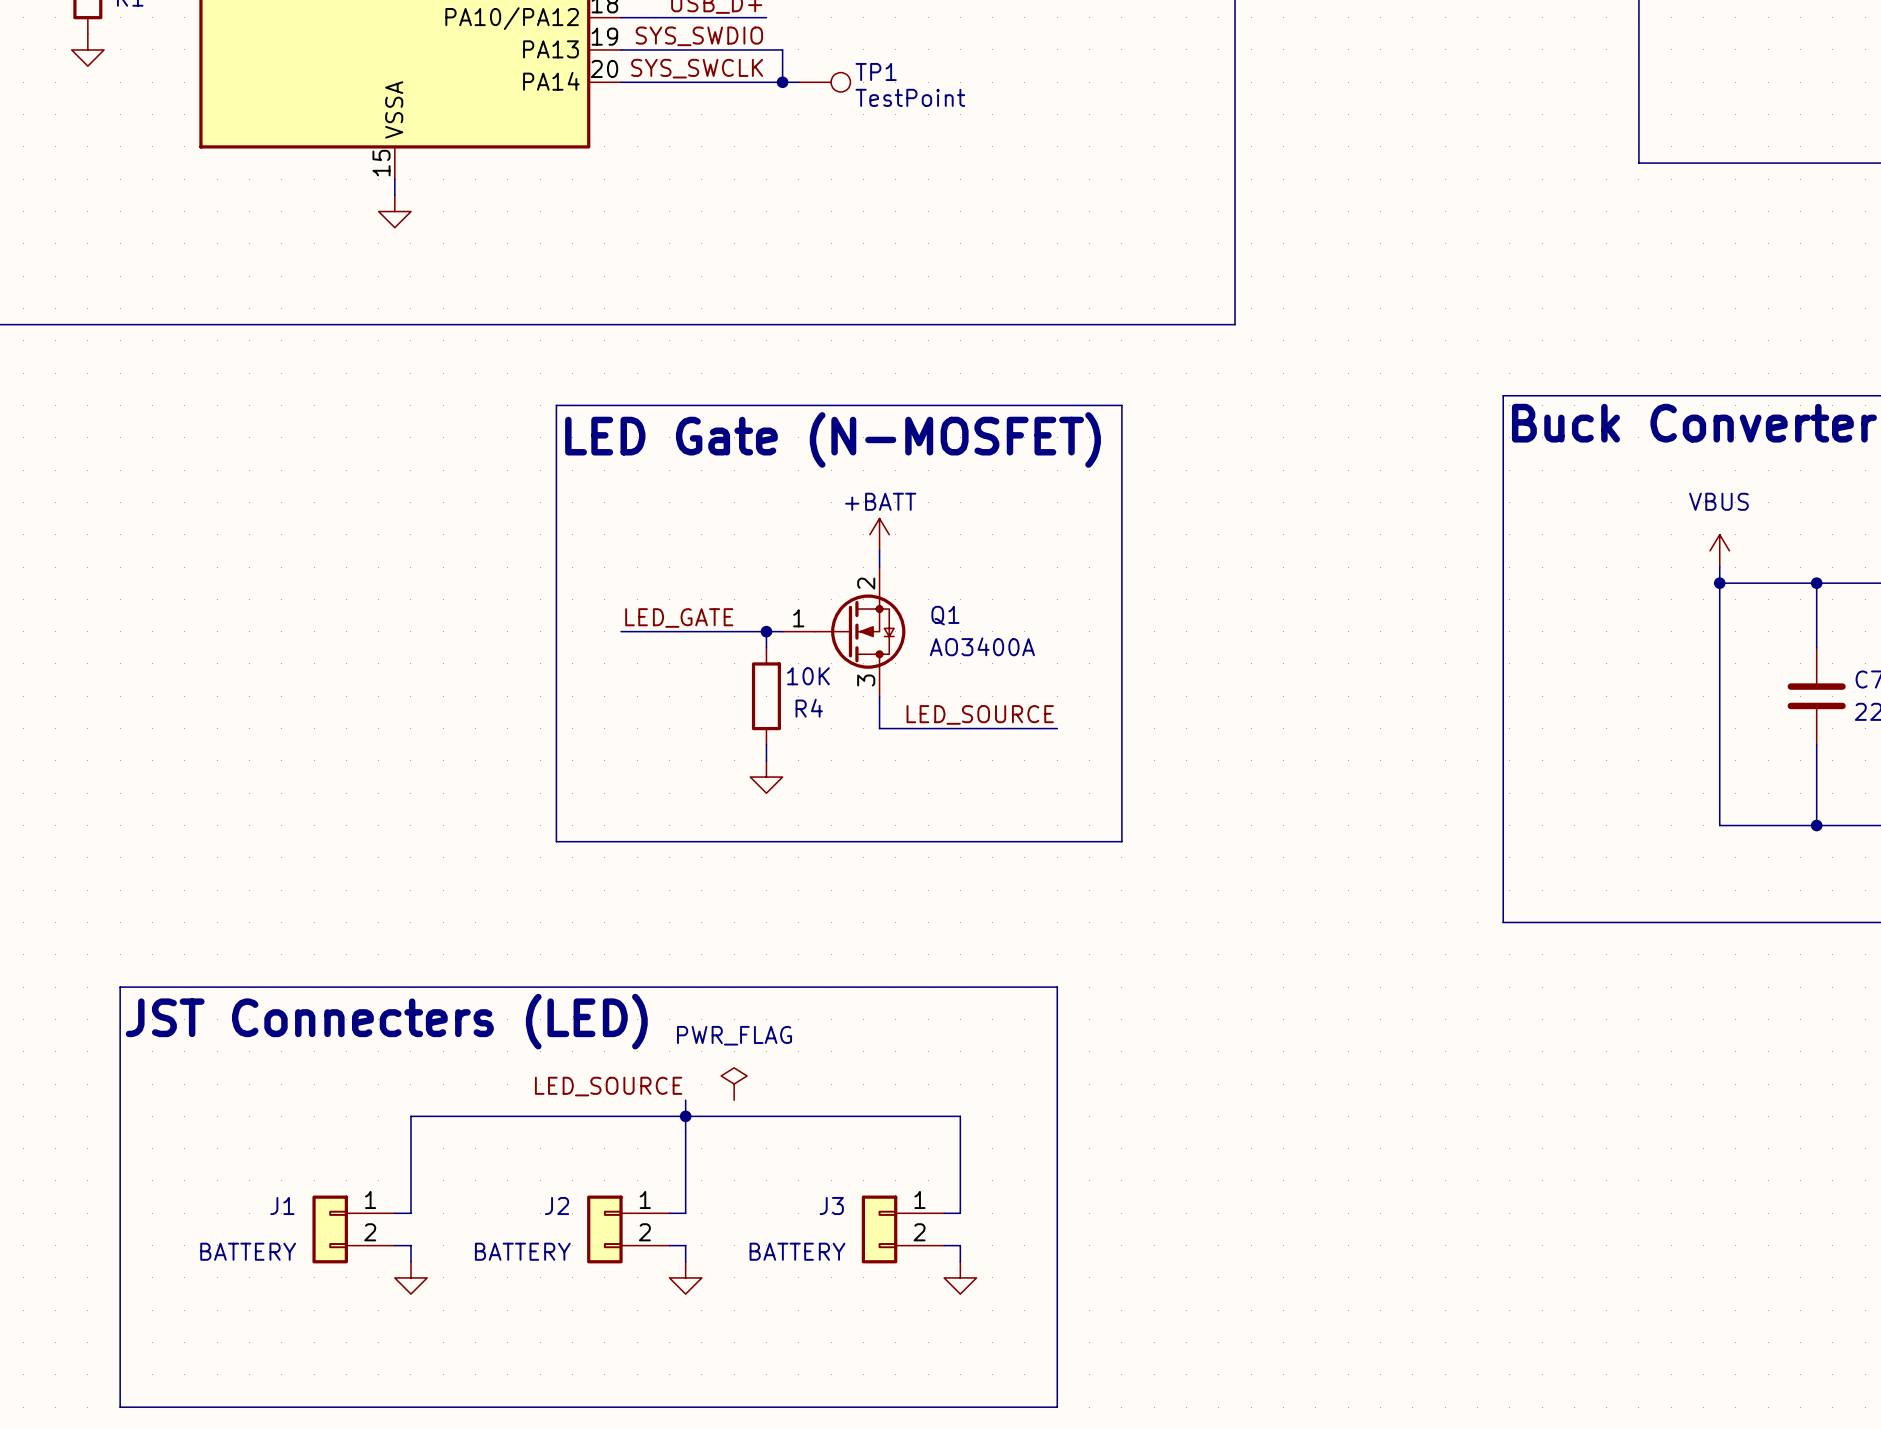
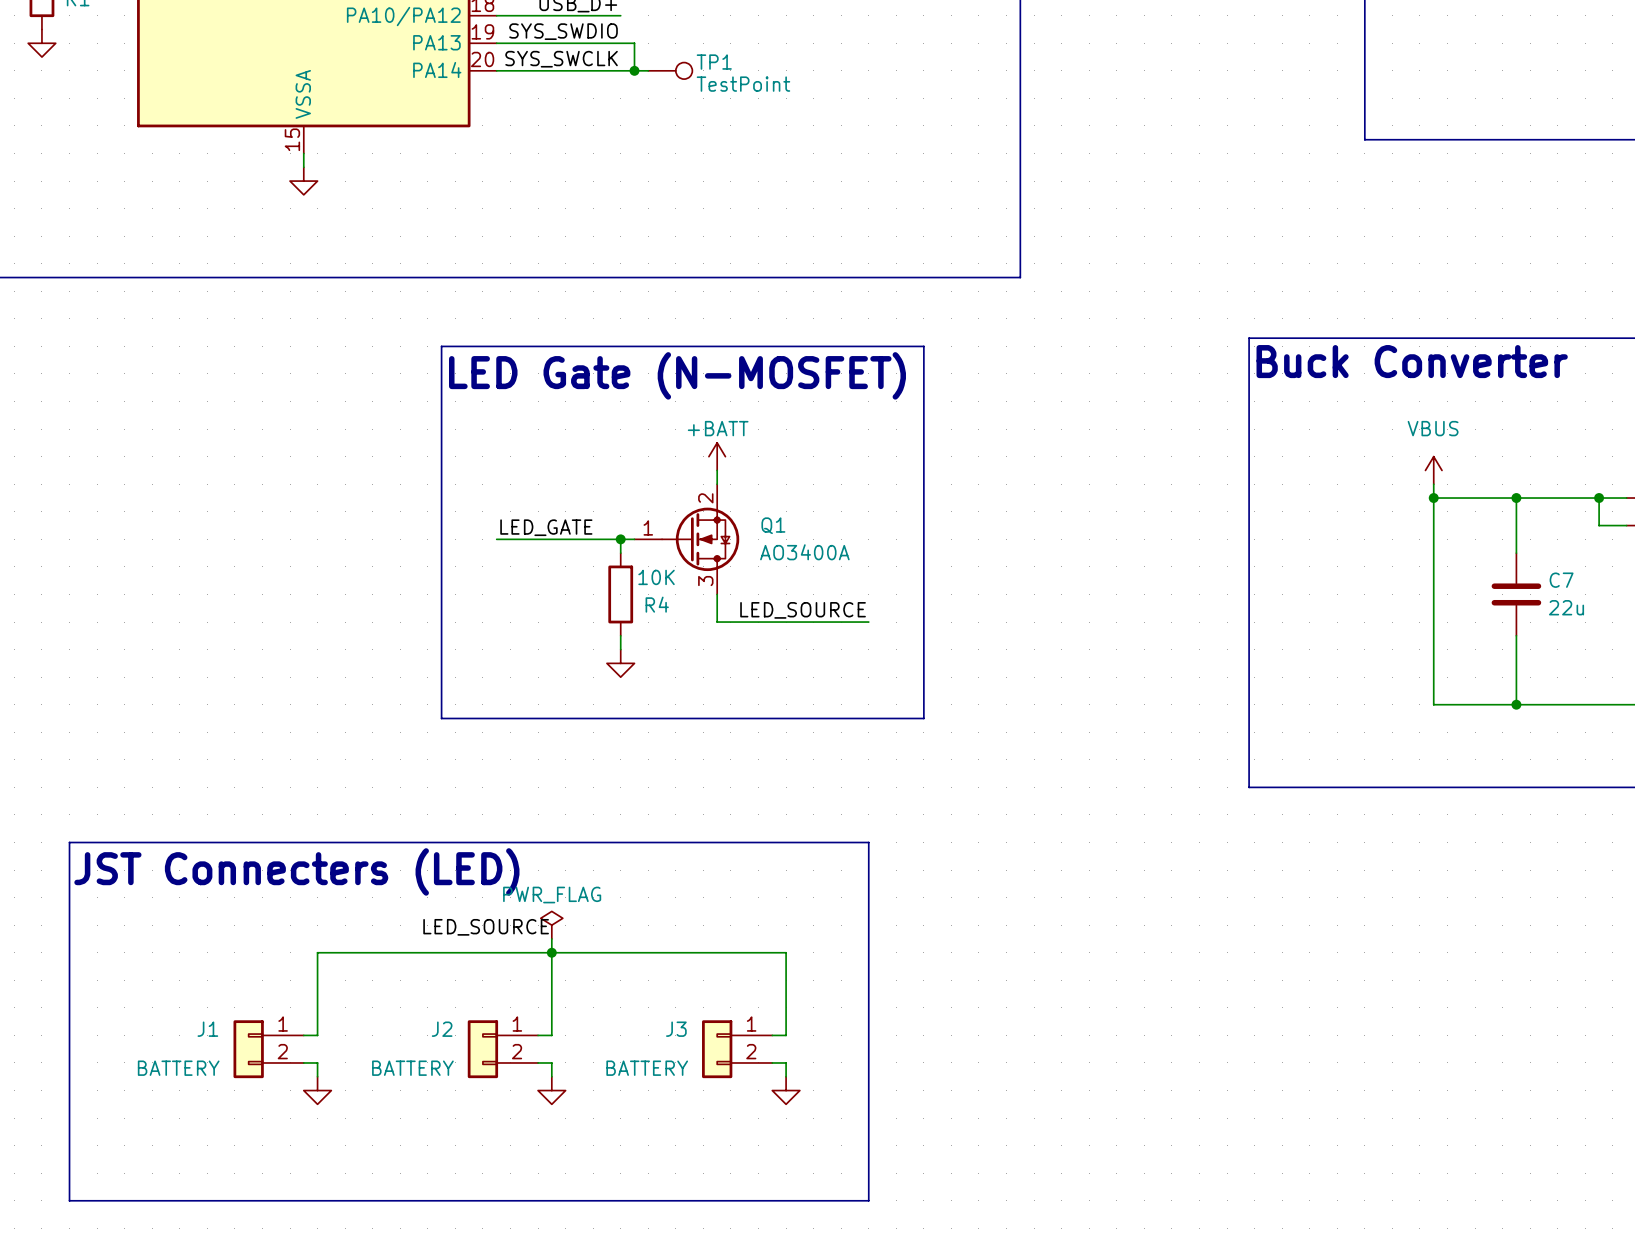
power symbol text position: PWR_FLAG (734, 1035) -> PWR_FLAG (552, 895)
power symbol position: PWR_FLAG (734, 1084) -> PWR_FLAG (551, 925)

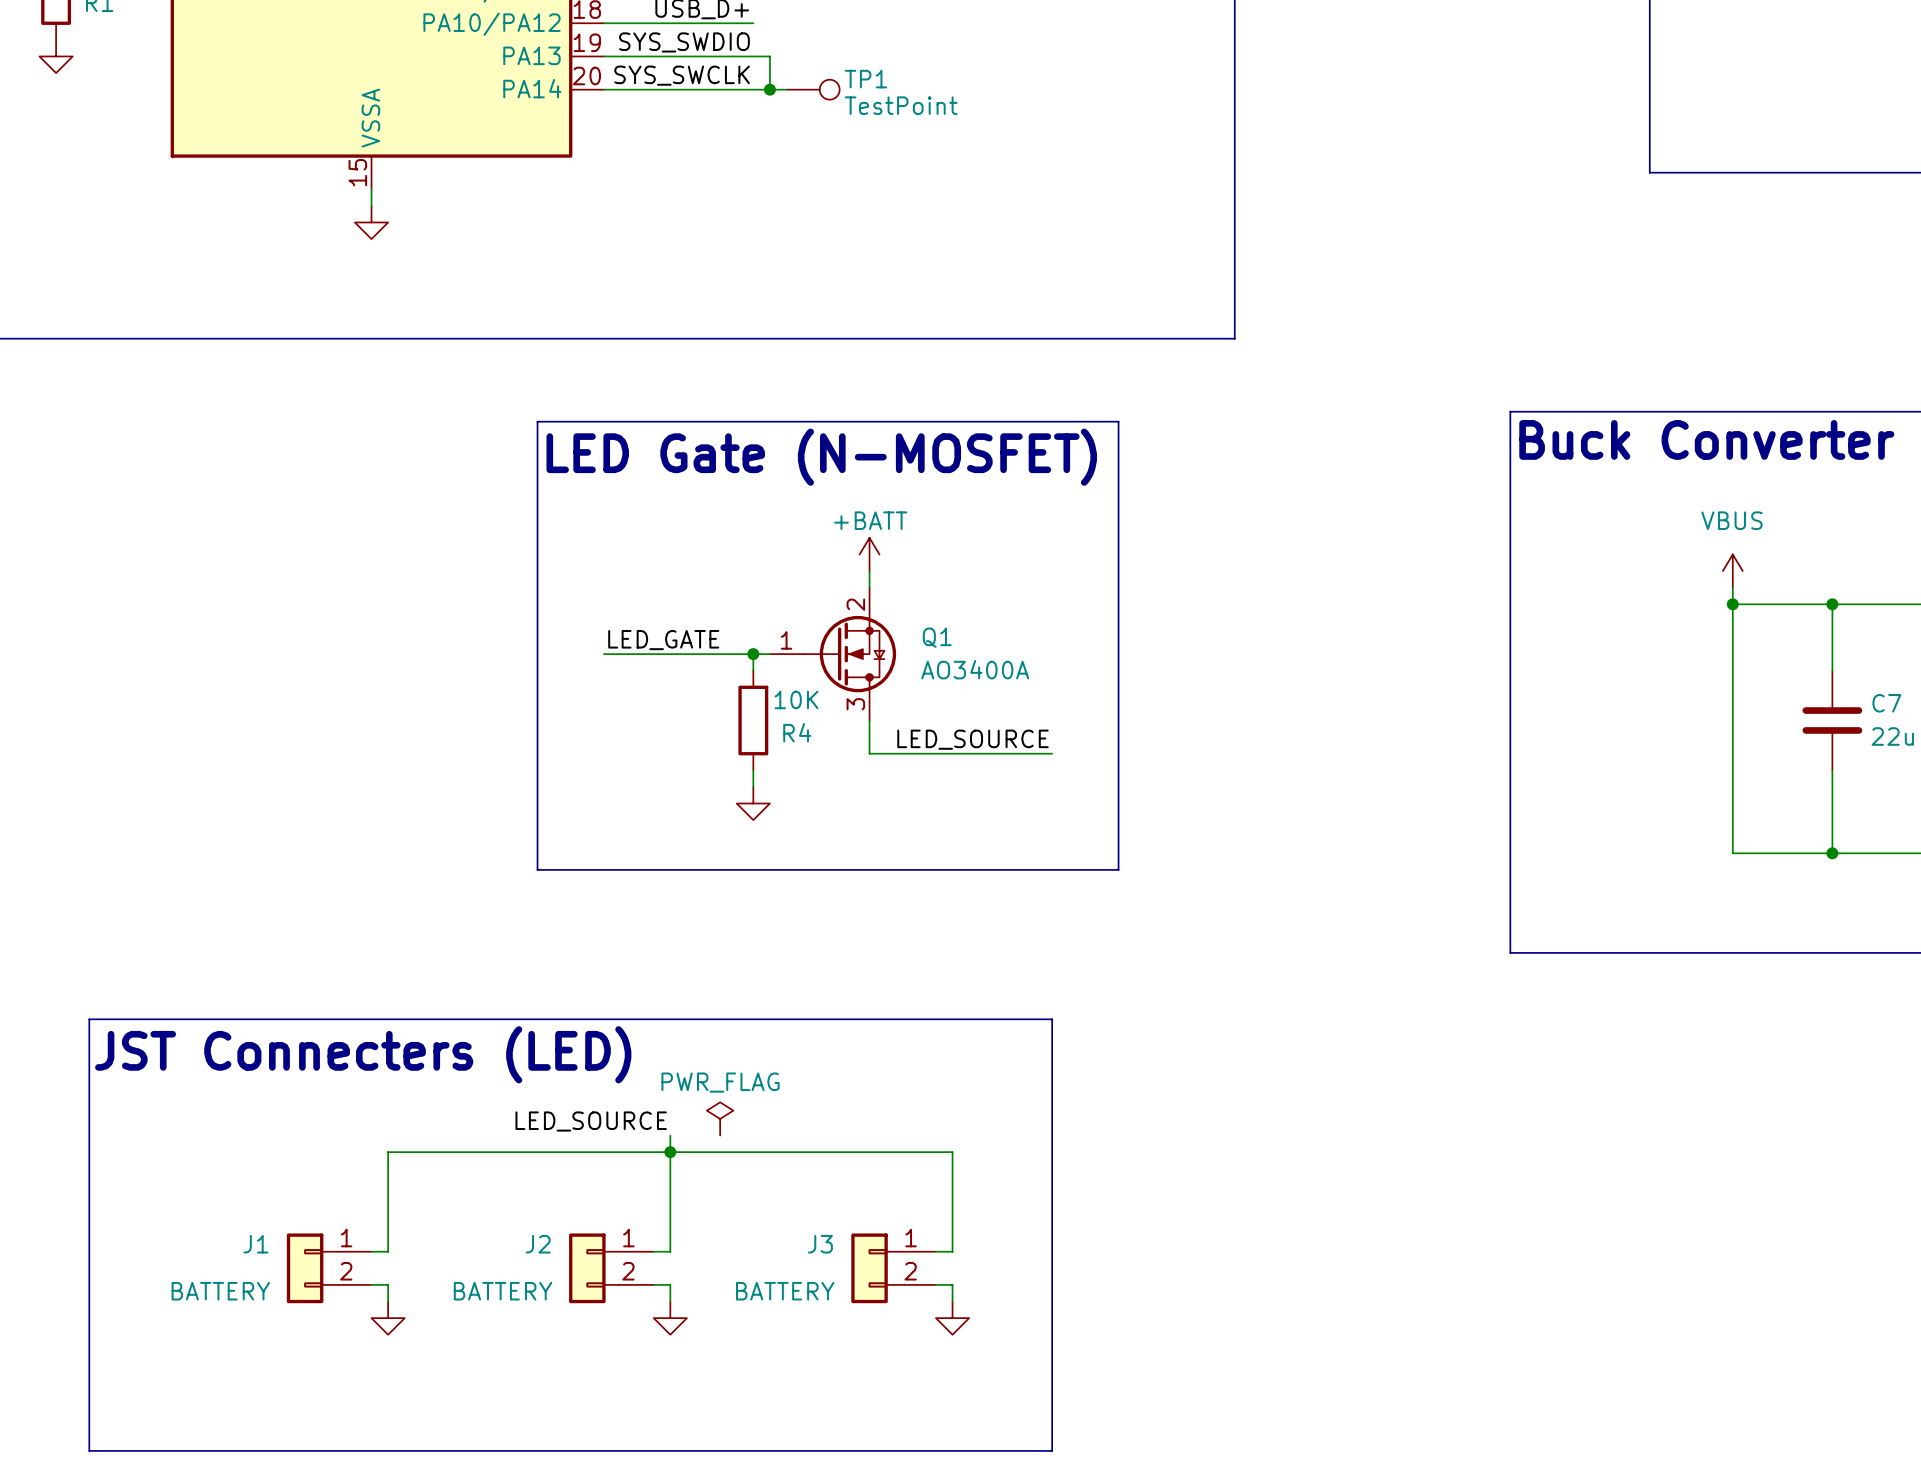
power symbol position: PWR_FLAG (551, 925) -> PWR_FLAG (720, 1118)

